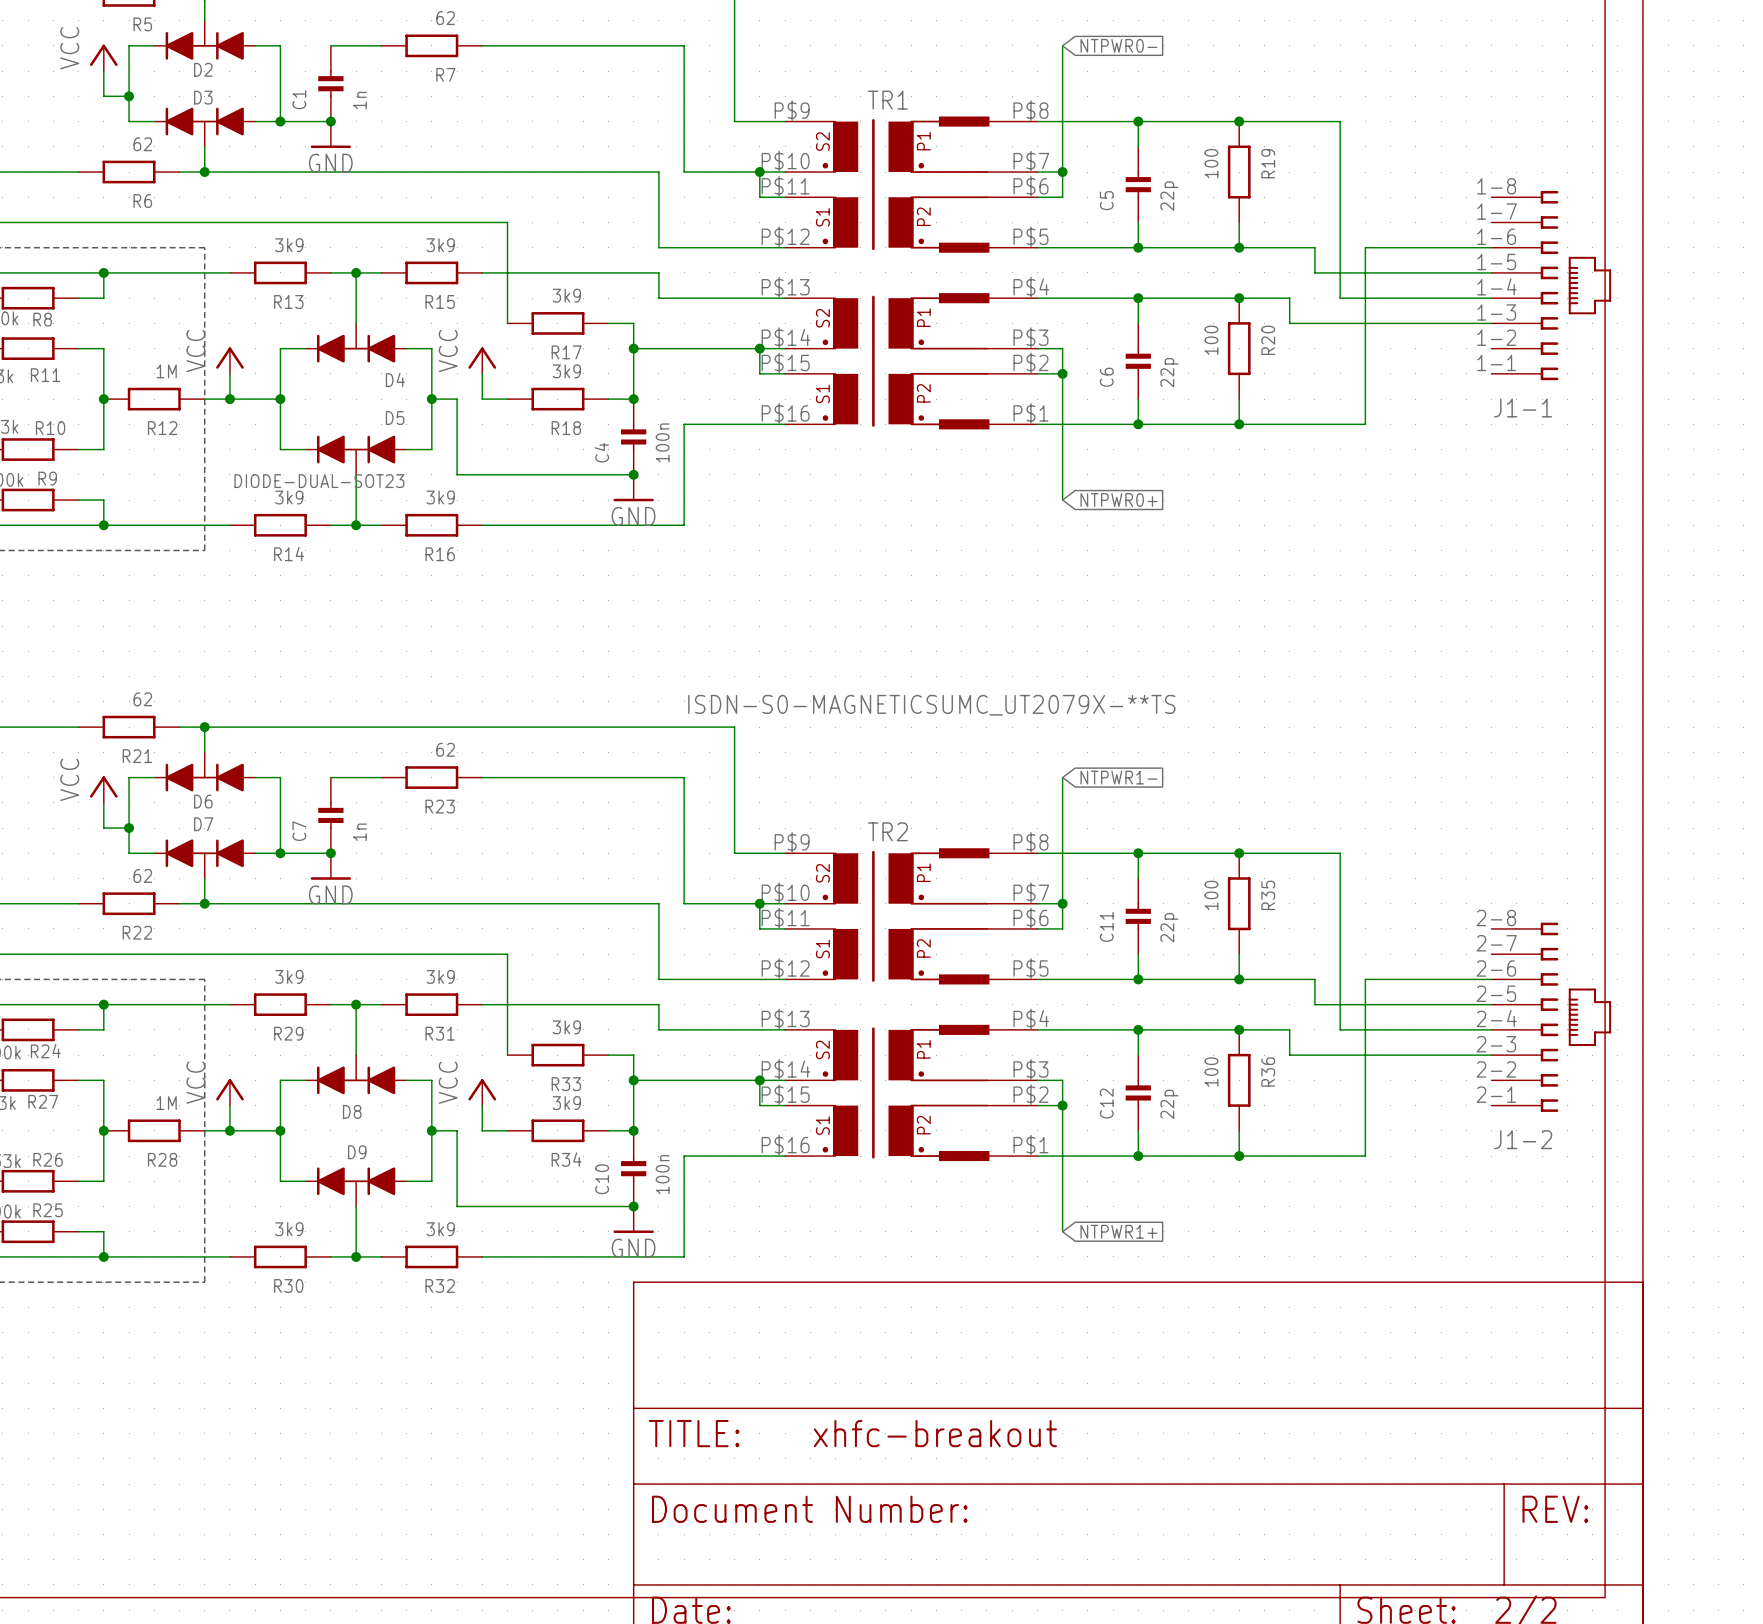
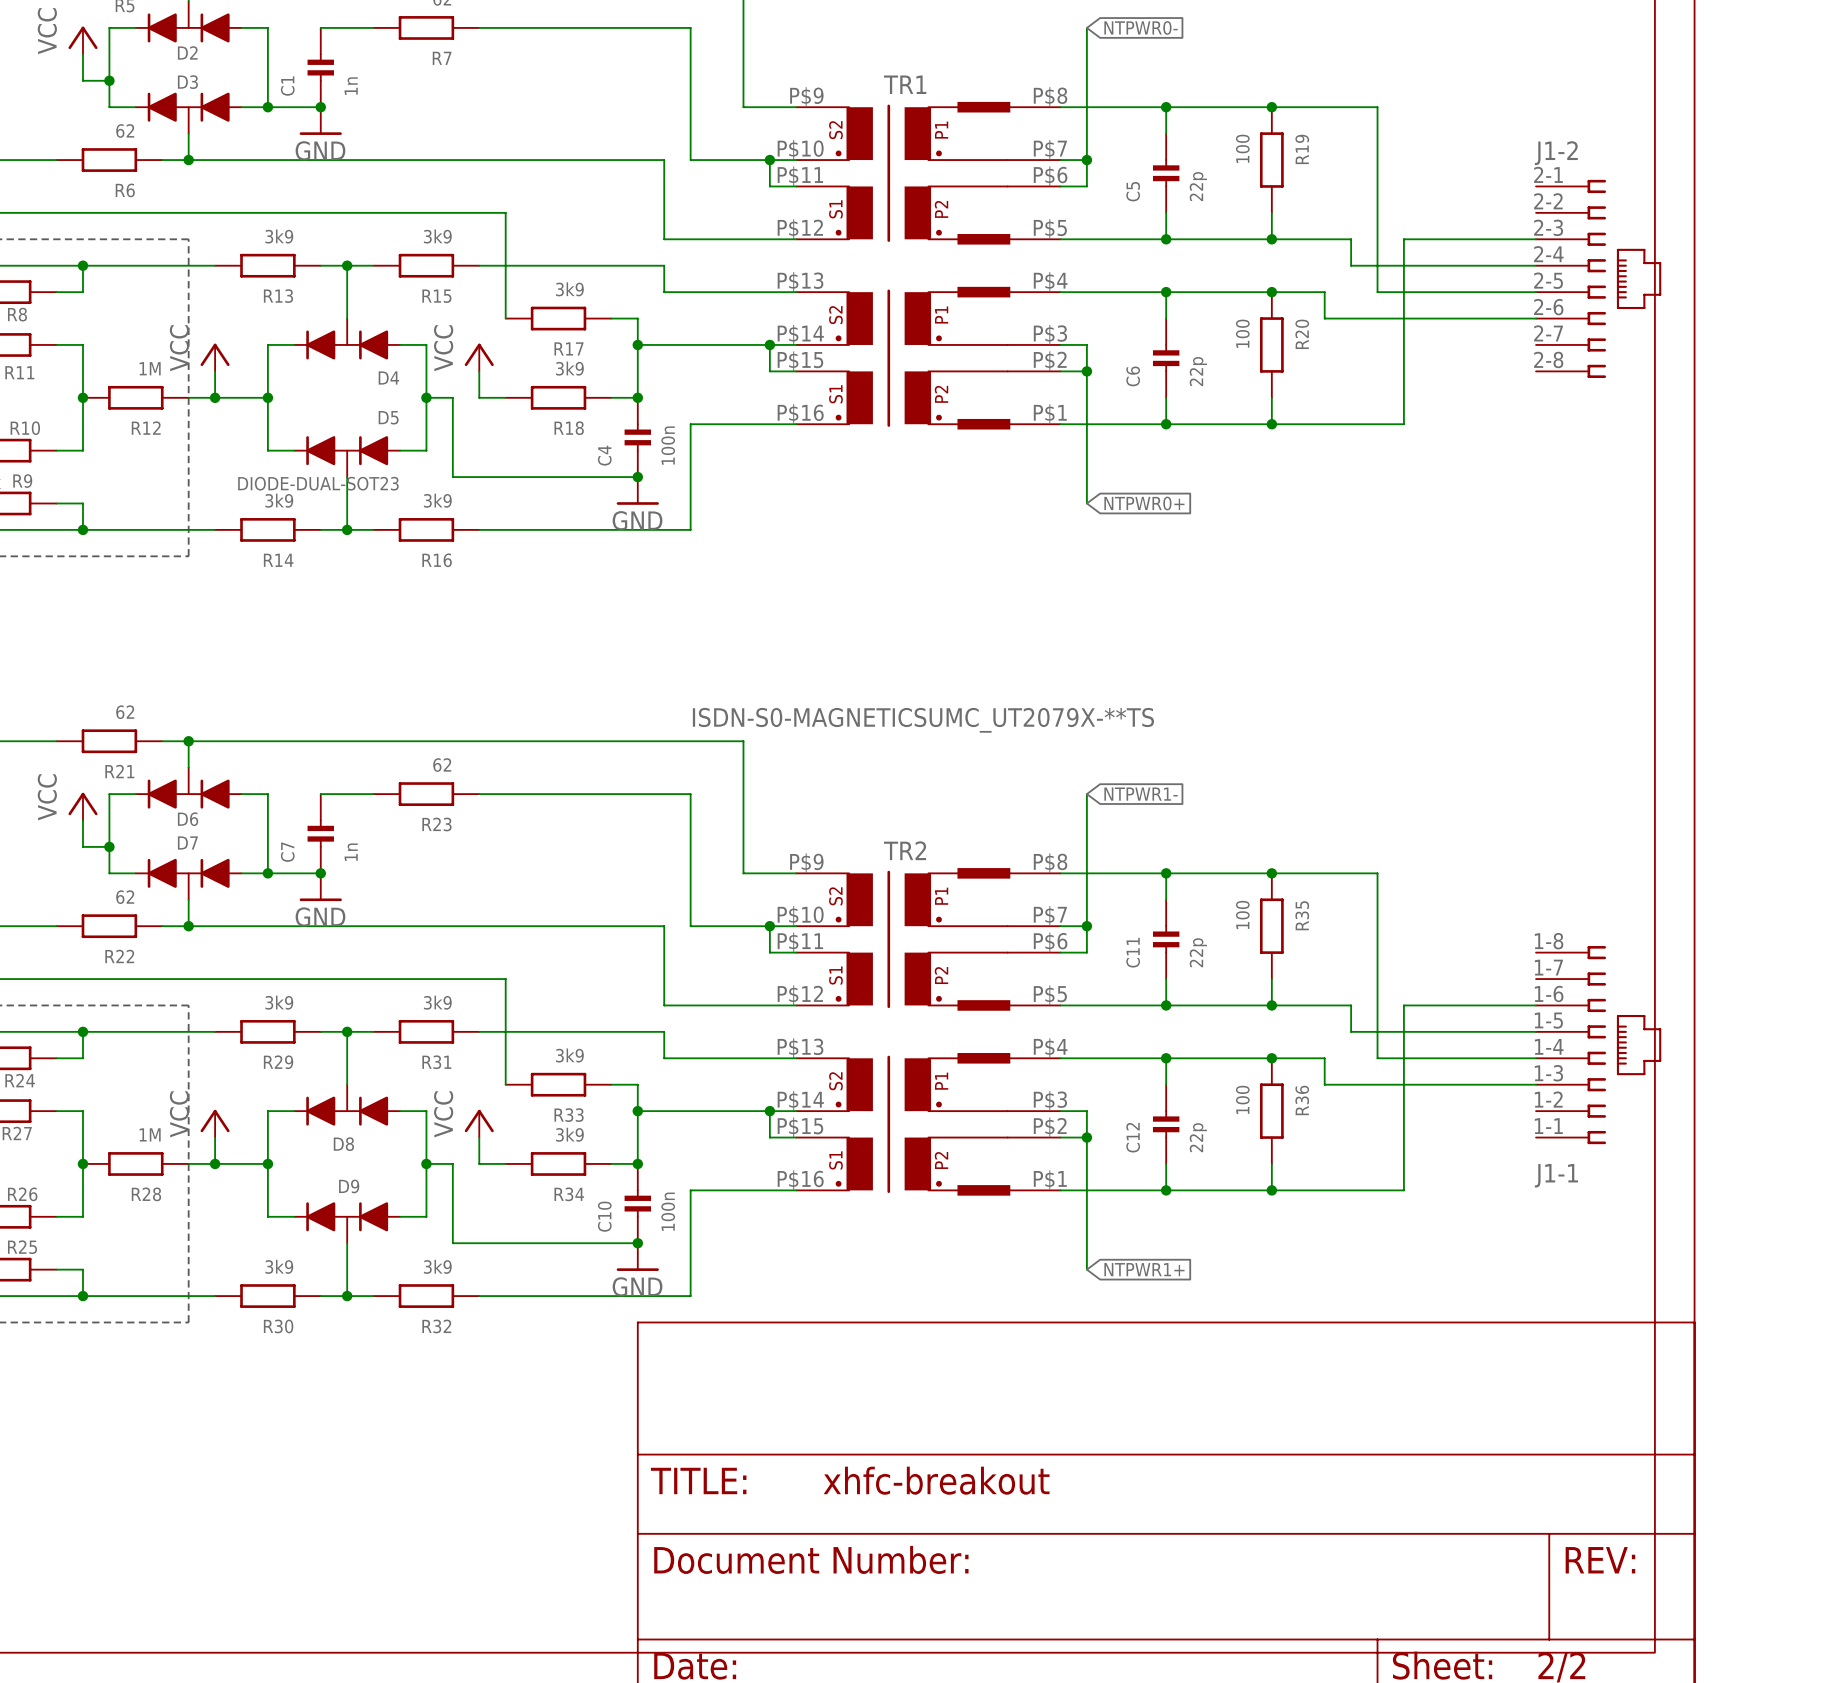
J1-1 position: (1551, 285) -> (1598, 1045)
J1-2 position: (1551, 1017) -> (1598, 278)
J1-2 flip: as is (1575, 1017) -> up-down (1624, 278)

